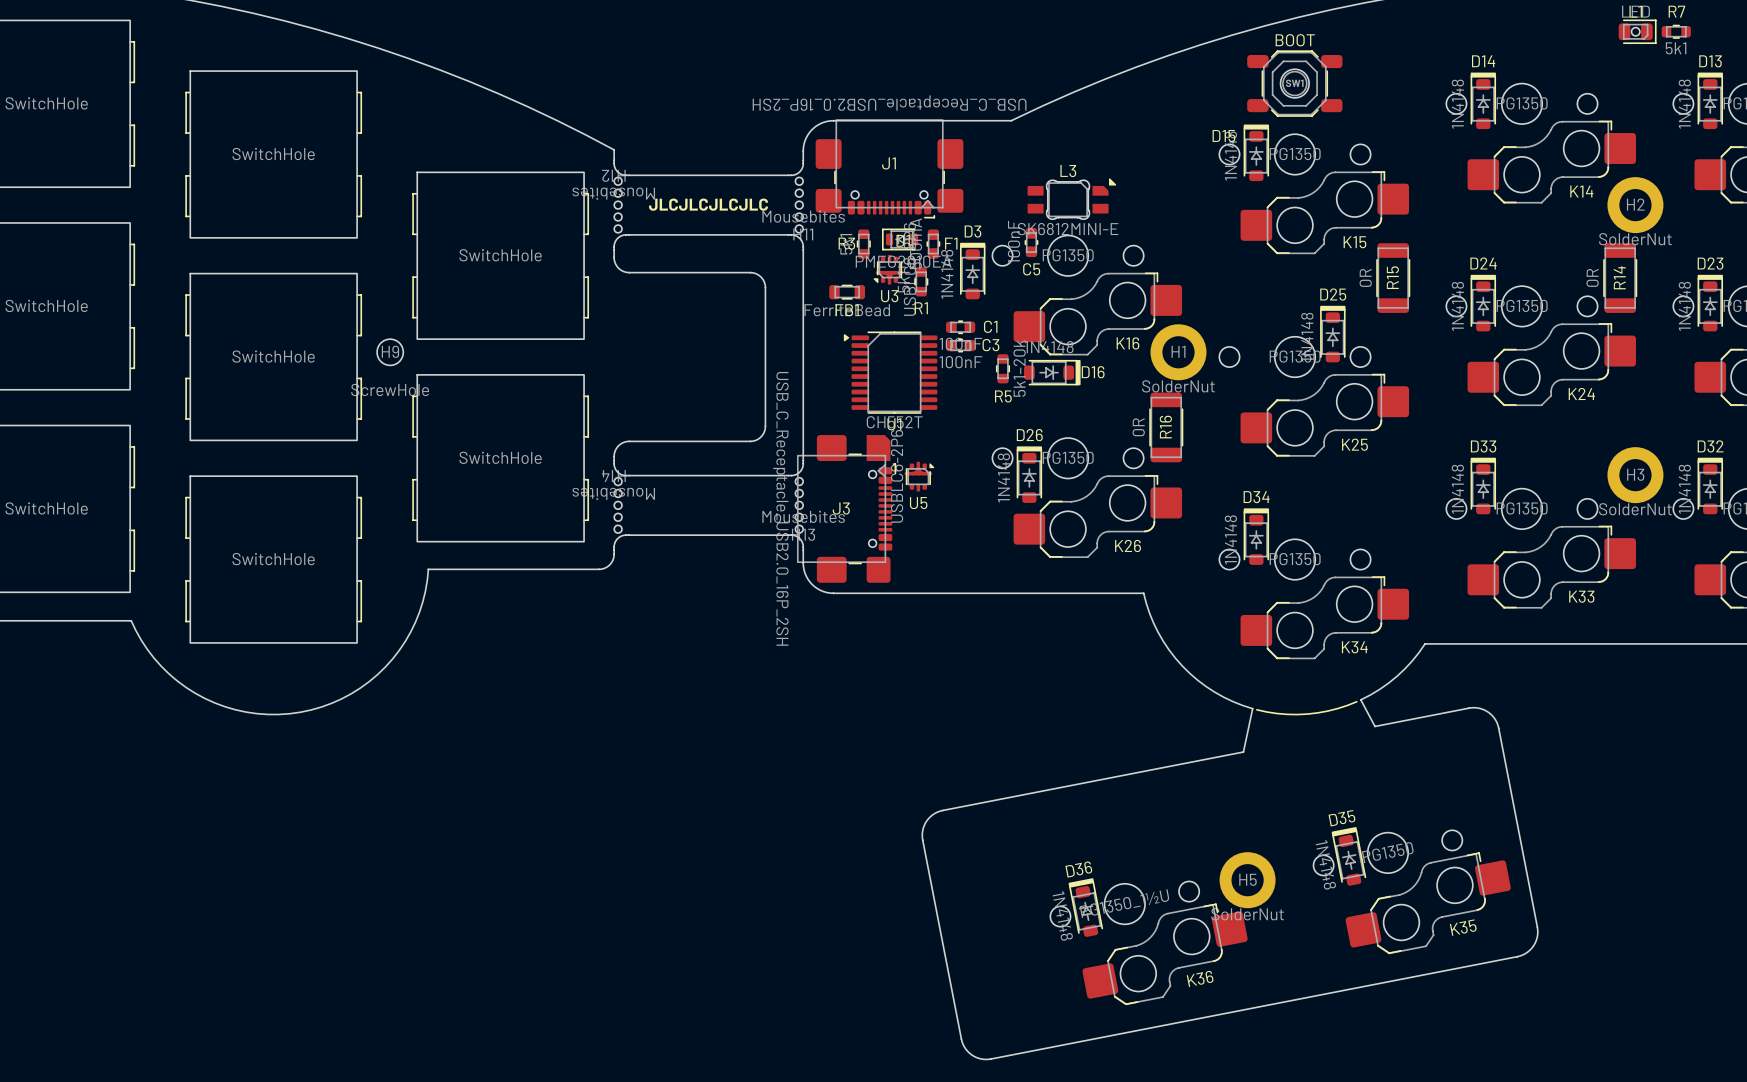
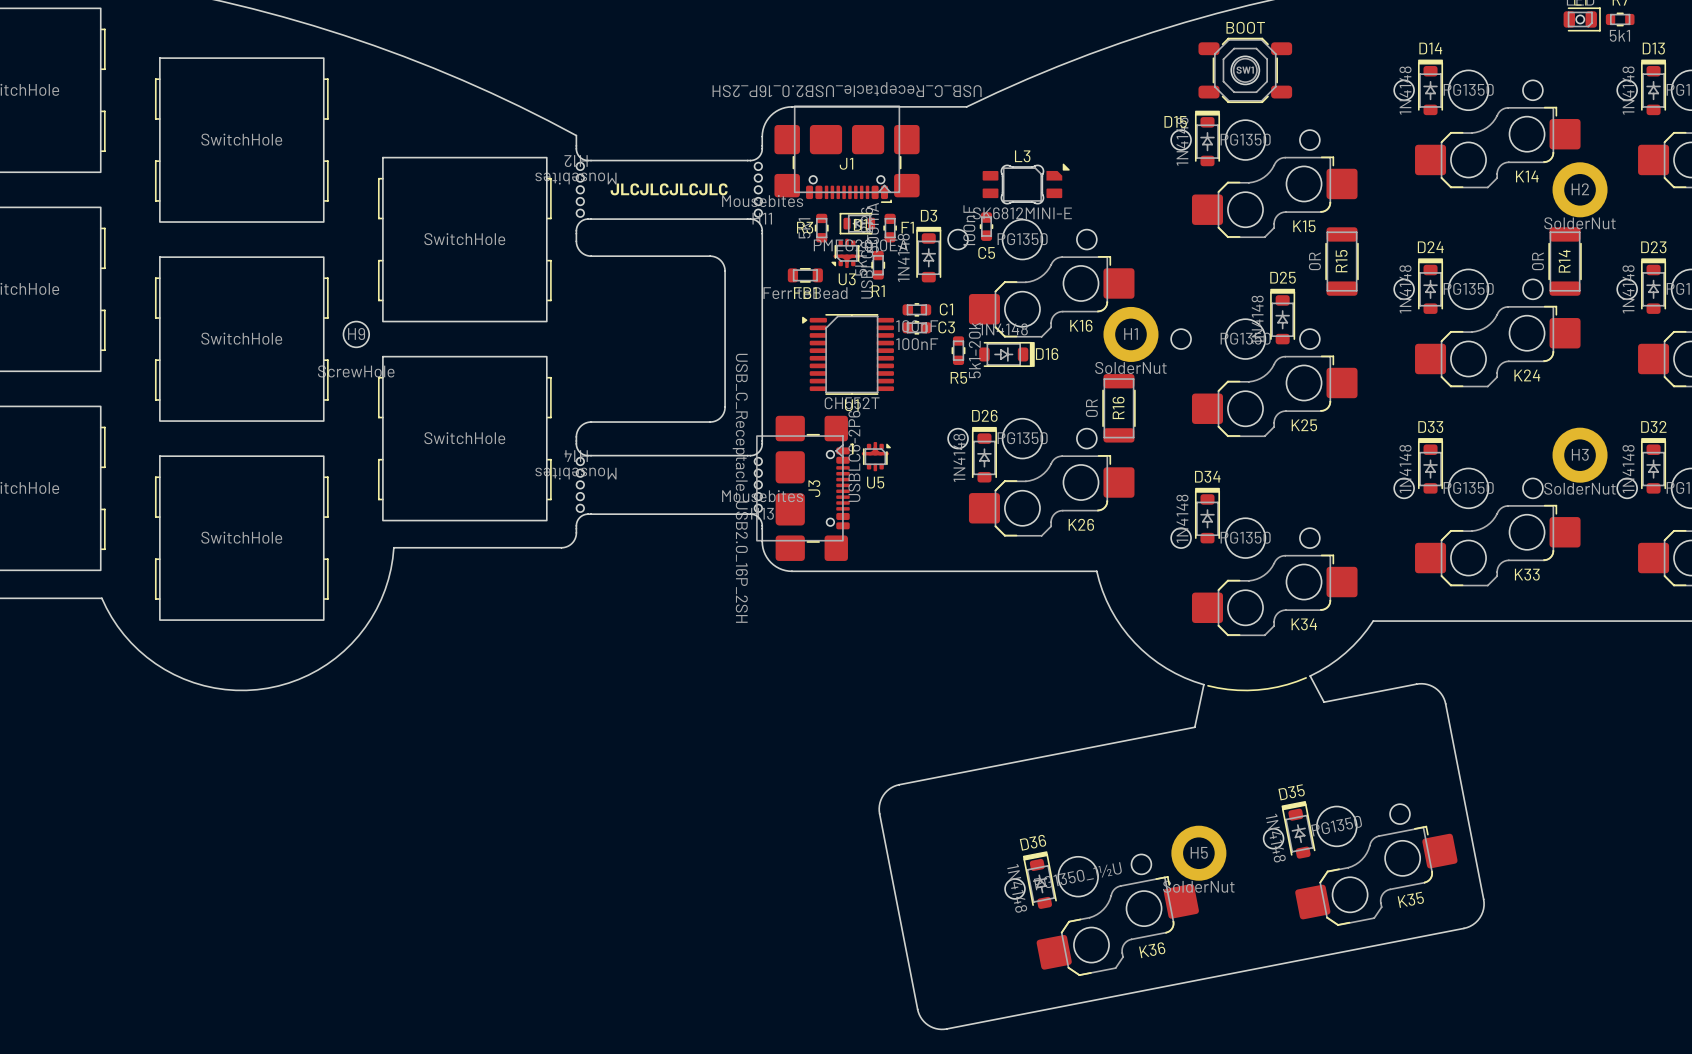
J1 footprint: [815, 119, 964, 219] -> [774, 105, 920, 203]
J3 footprint: [797, 435, 897, 583] -> [756, 415, 854, 561]

